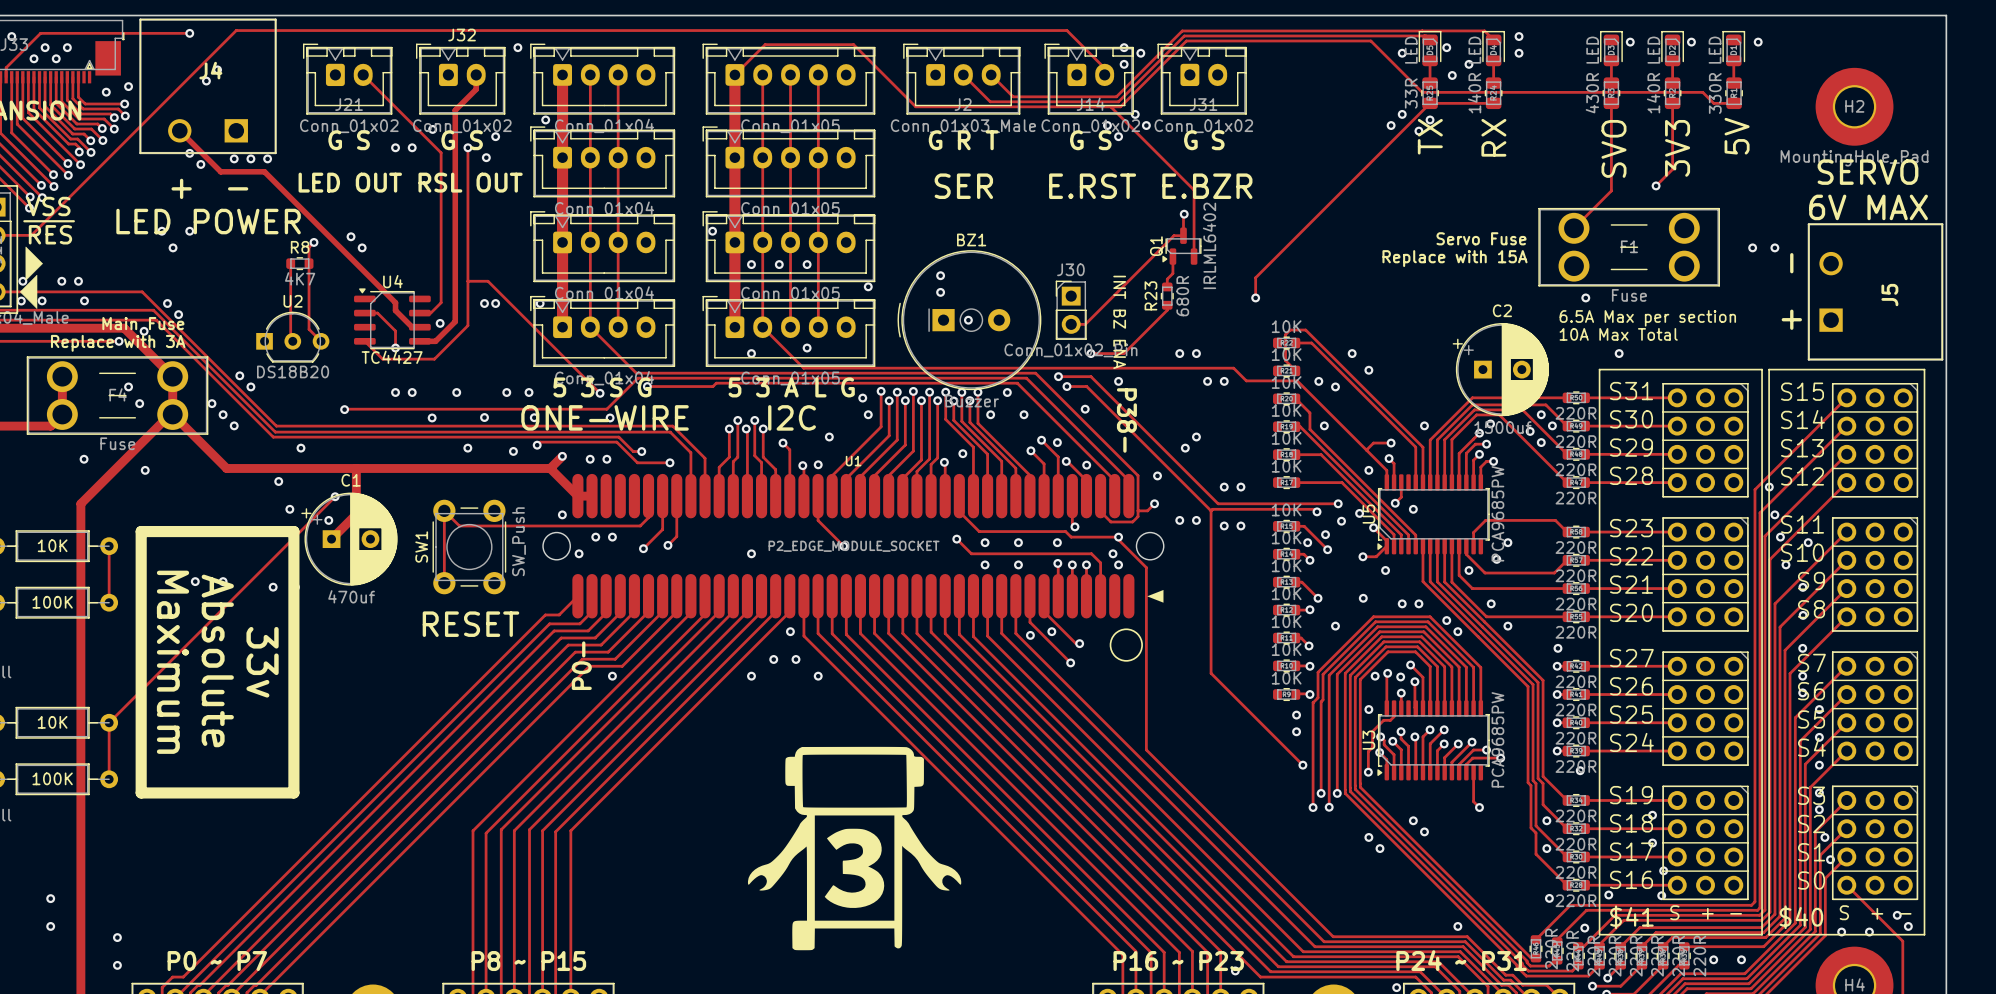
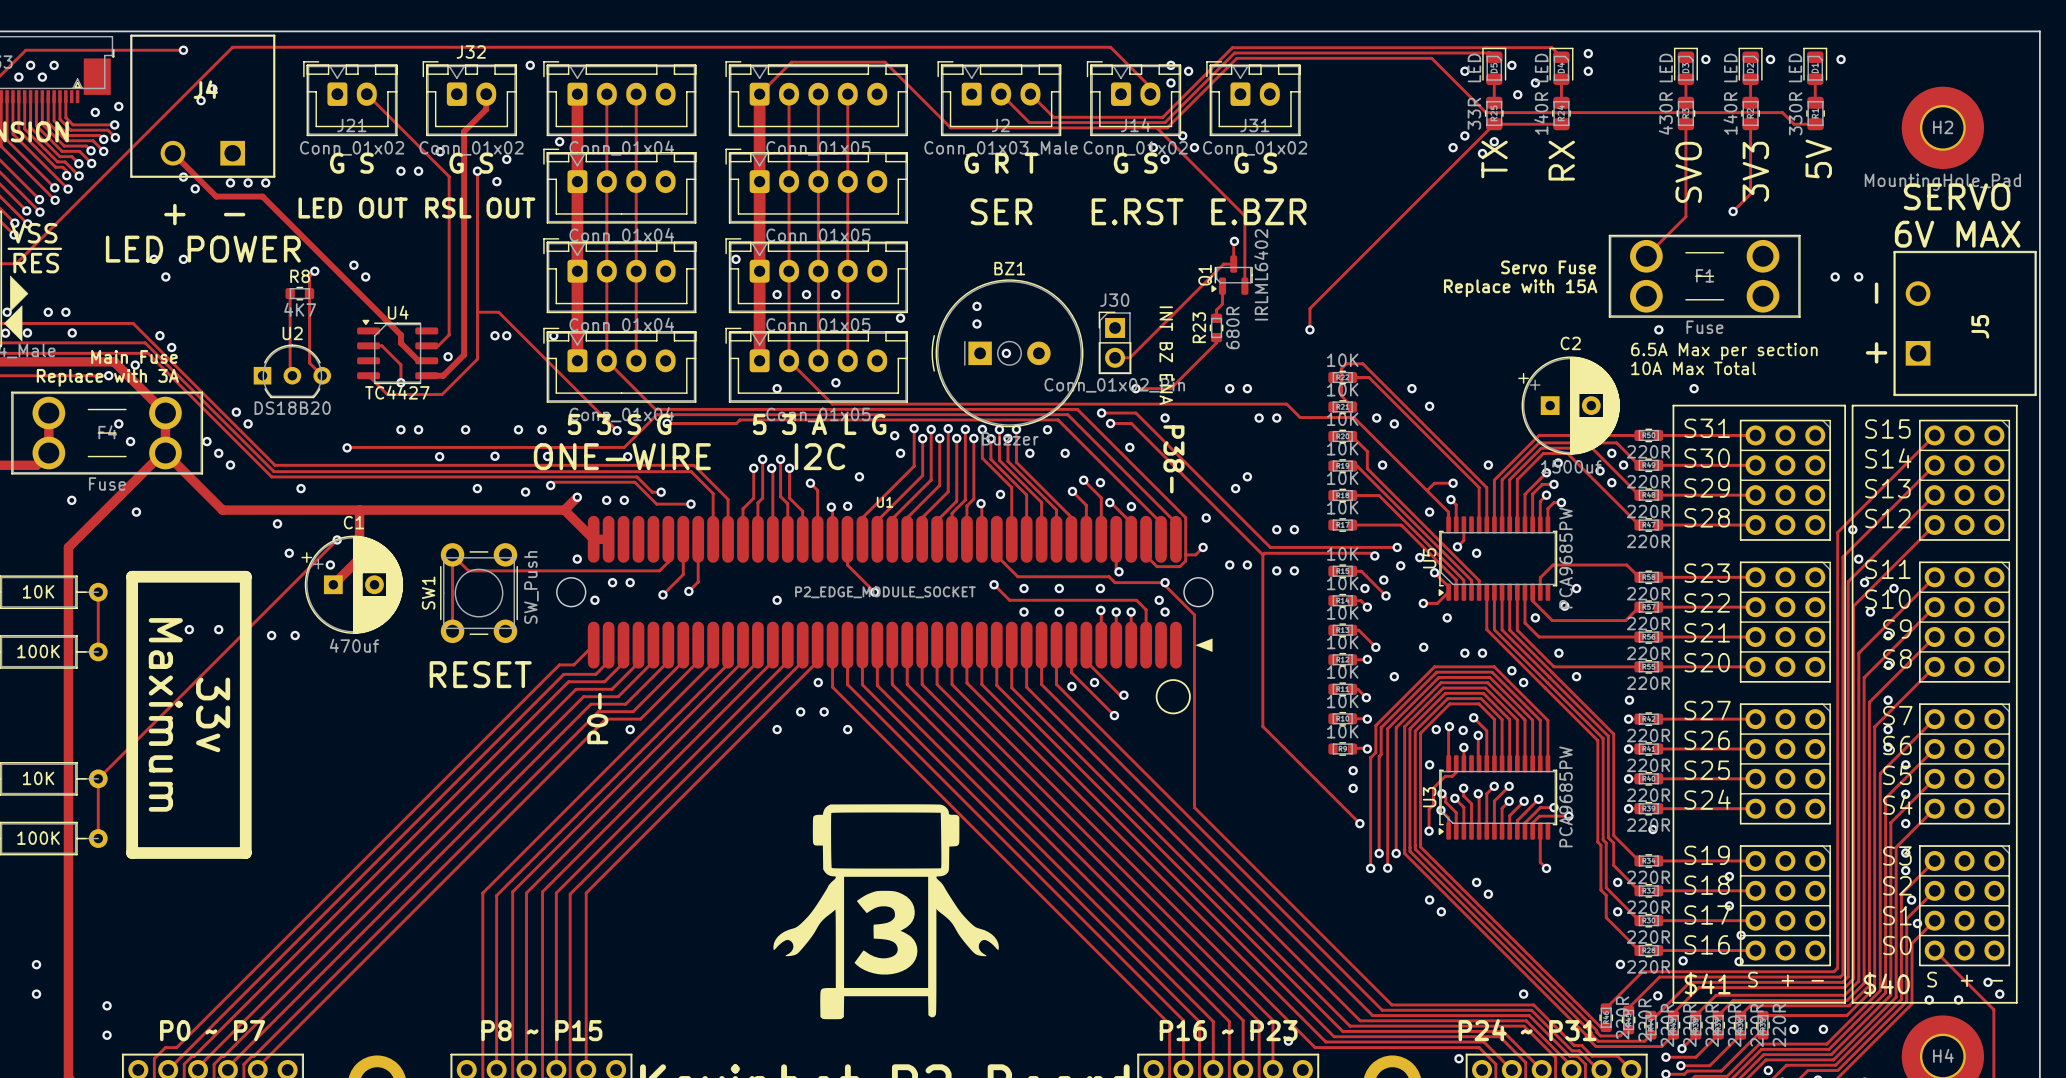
line: (248, 531) (293, 531) (293, 792) (248, 792) -> (245, 576) (245, 853)
text: Absolute (217, 660) -> 33v (213, 714)
text: 33v (262, 662) -> none

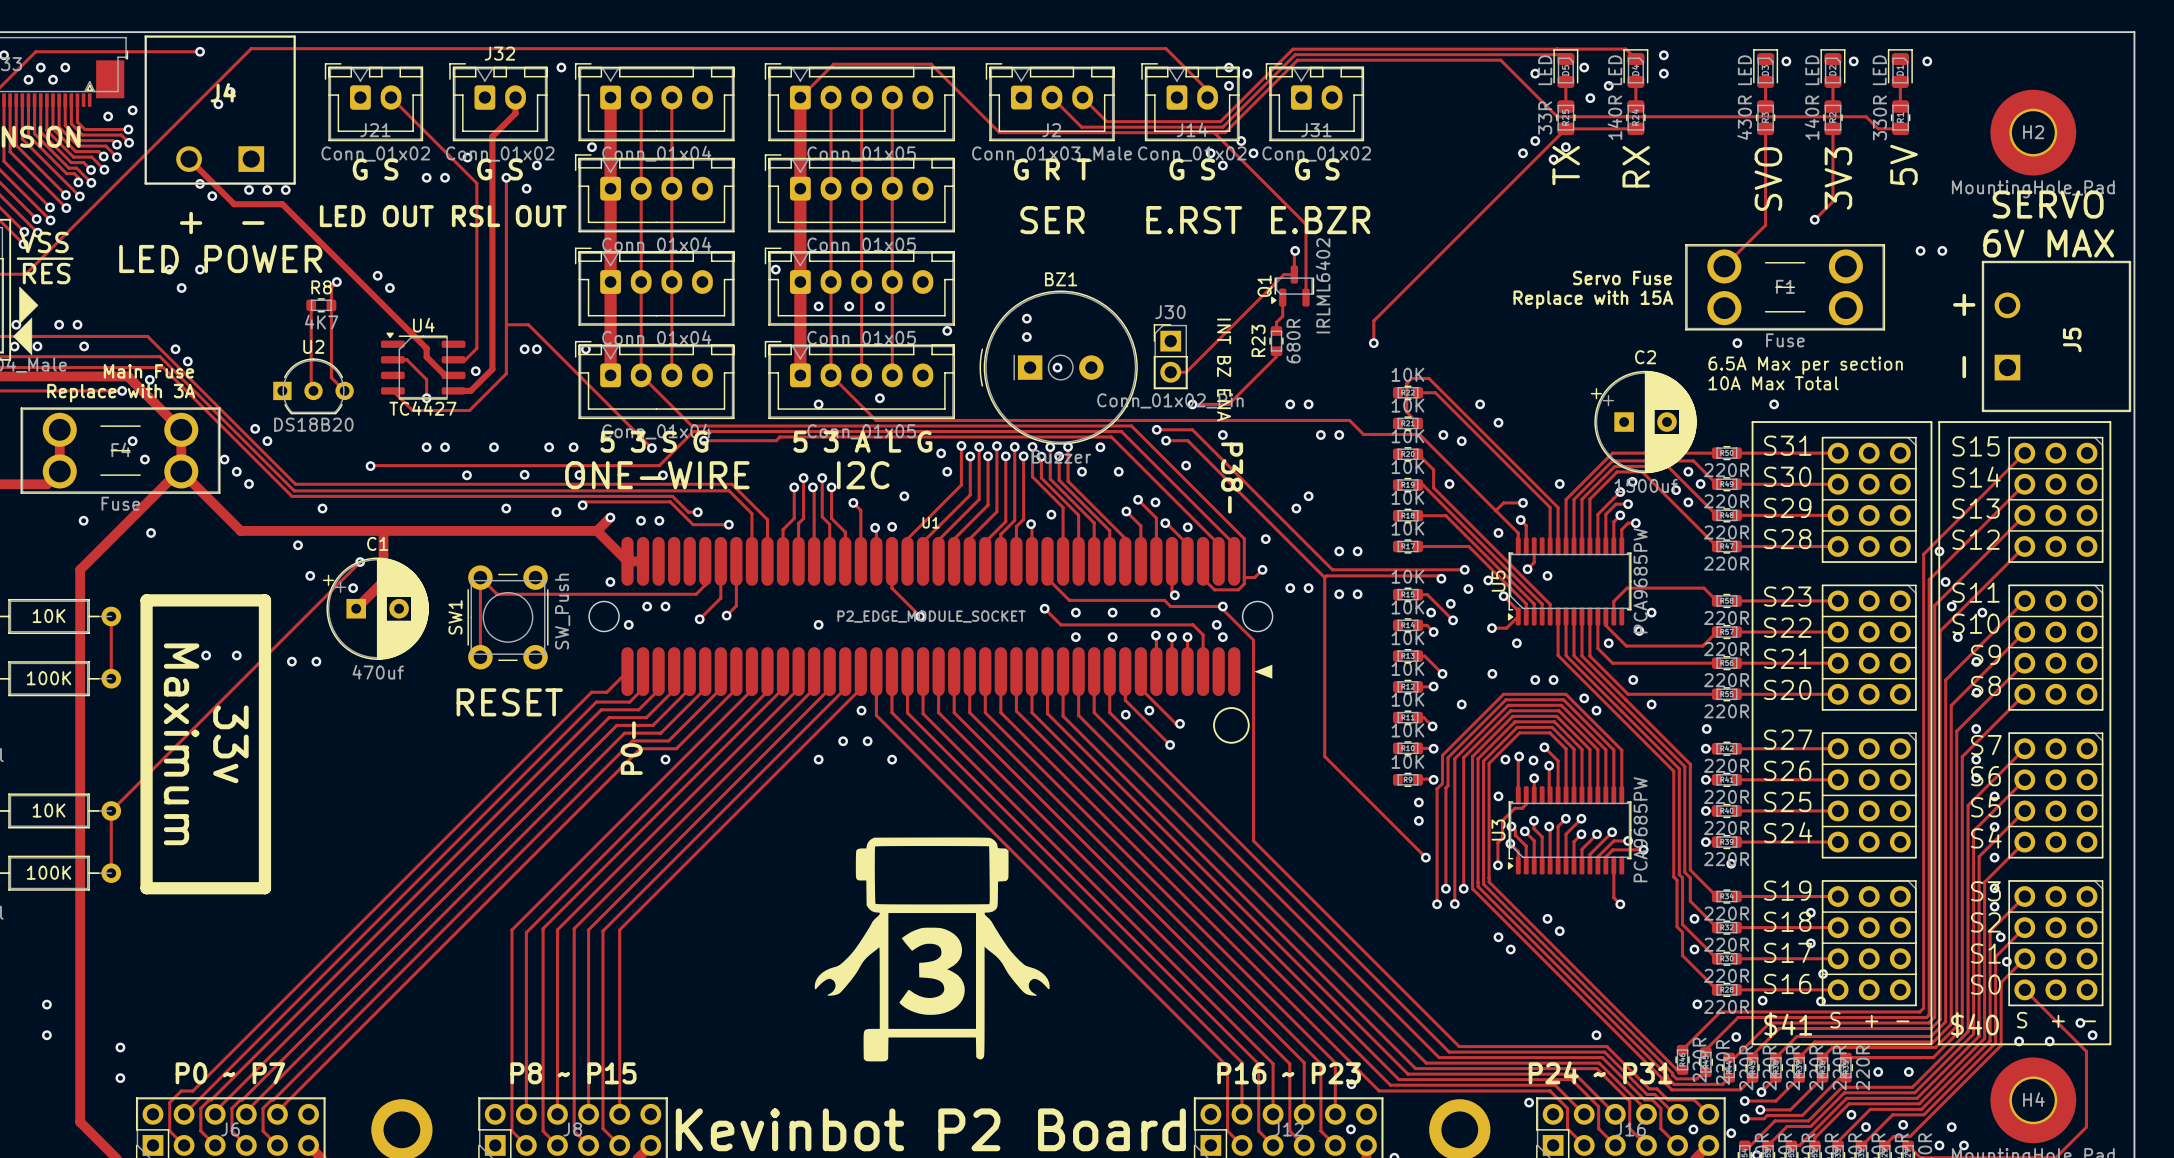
via: none -> (1920, 250)
via: none -> (1942, 250)
via: (1835, 276) -> none
via: (1858, 276) -> none
text: - (1876, 293) -> + (1964, 304)
text: + (1876, 352) -> - (1964, 367)

